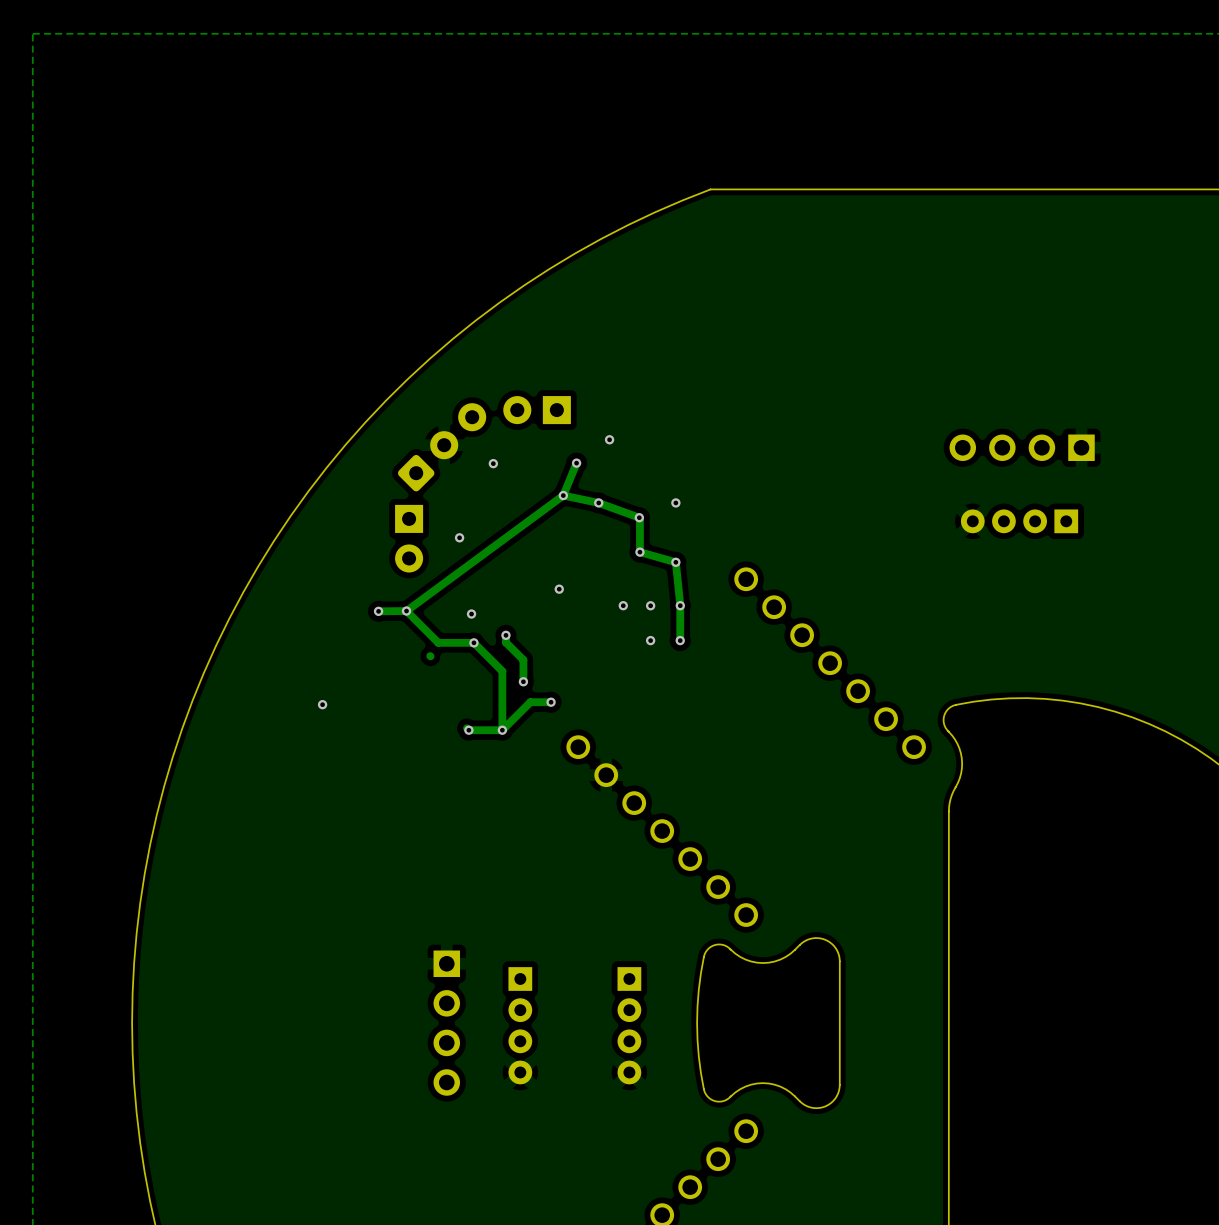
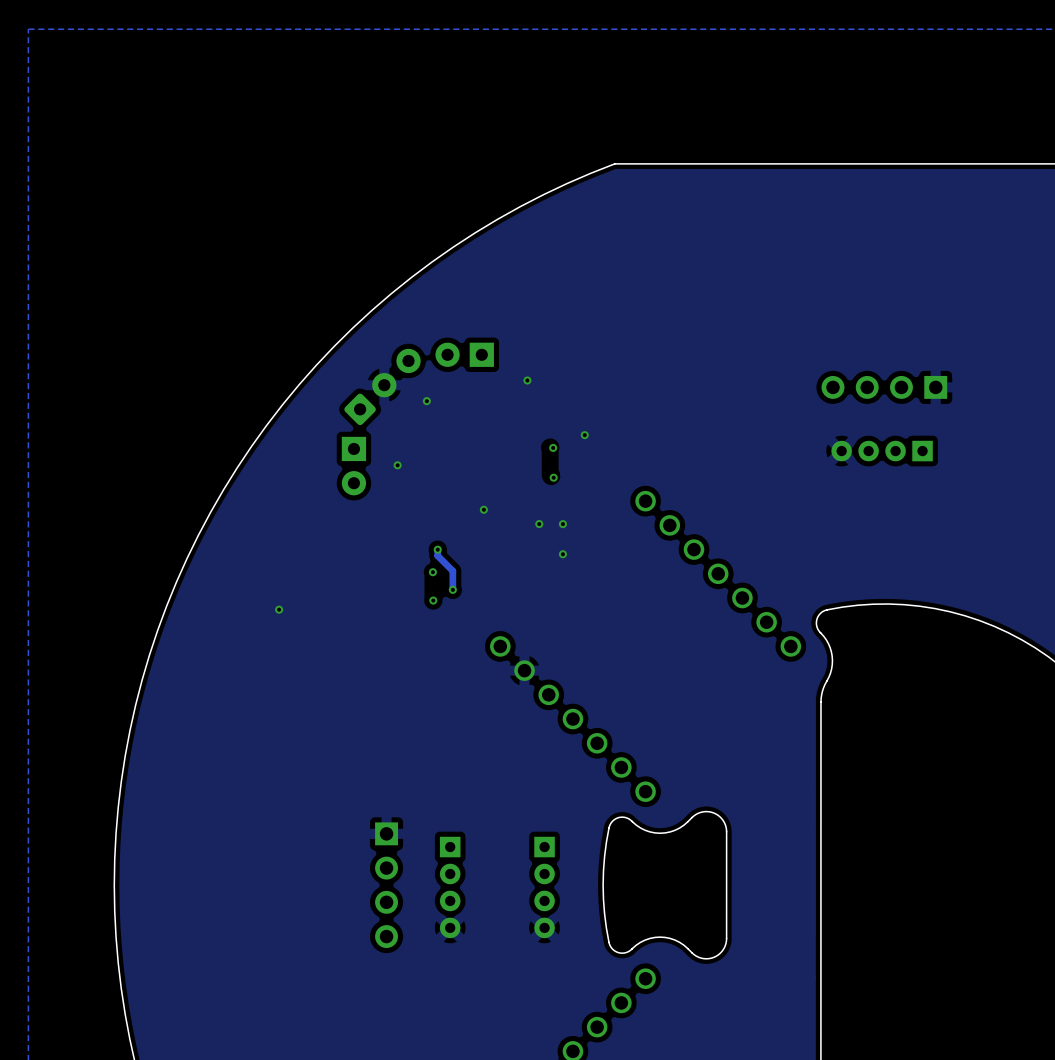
track: (576, 463) (563, 495) -> none
via: (576, 463) -> none
track: (563, 495) (406, 611) -> none
track: (563, 495) (598, 502) (639, 517) (639, 552) (675, 562) (680, 605) (680, 640) -> none
via: (563, 495) -> none
via: (598, 502) -> none
via: (675, 562) -> none
via: (680, 605) -> none
via: (378, 611) -> none
track: (406, 611) (438, 642) (473, 642) (502, 671) (502, 730) -> none
track: (406, 611) (378, 611) -> none
via: (406, 611) -> none
via: (471, 614) -> none
via: (680, 640) -> none
via: (473, 642) -> none
track: (430, 656) (430, 656) -> none
via: none -> (432, 572)
via: none -> (433, 600)
track: (551, 702) (530, 702) (502, 730) -> none
via: (551, 702) -> none
track: (466, 728) (468, 730) (502, 730) -> none
via: (468, 730) -> none
via: (502, 730) -> none

